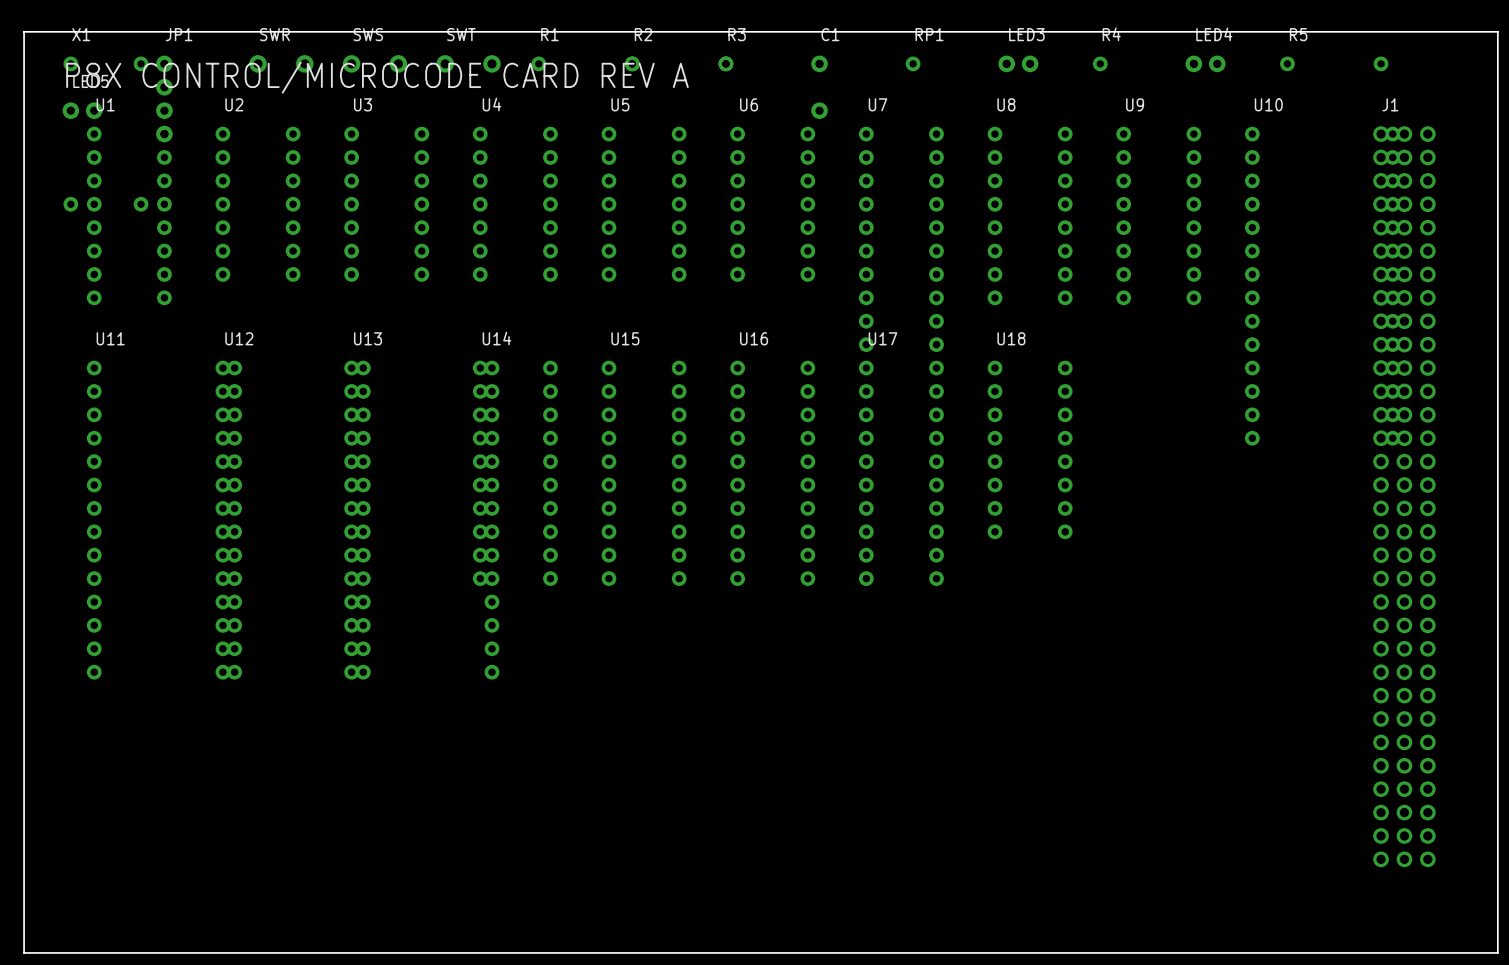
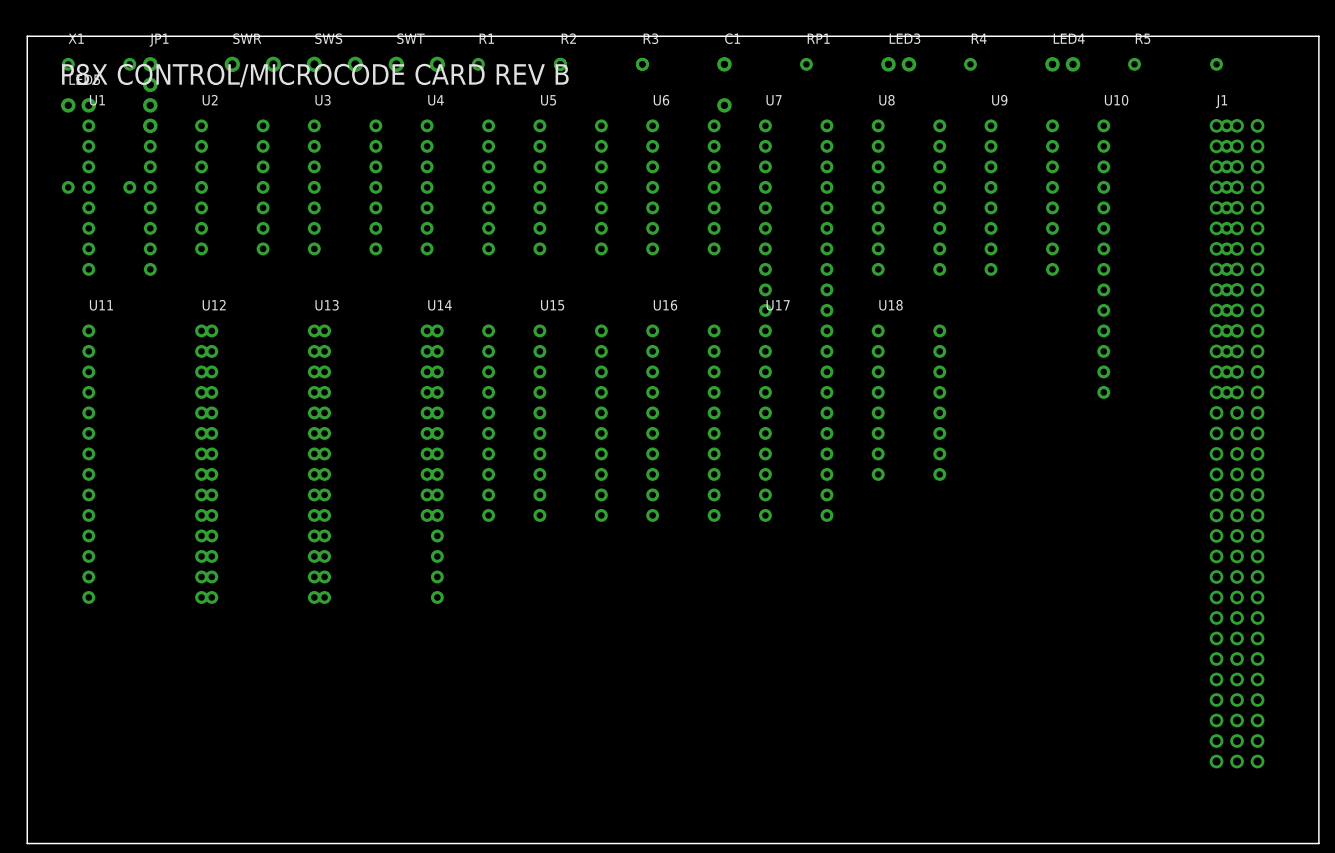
text: P8X CONTROL/MICROCODE CARD REV A (377, 77) -> P8X CONTROL/MICROCODE CARD REV B (315, 75)

